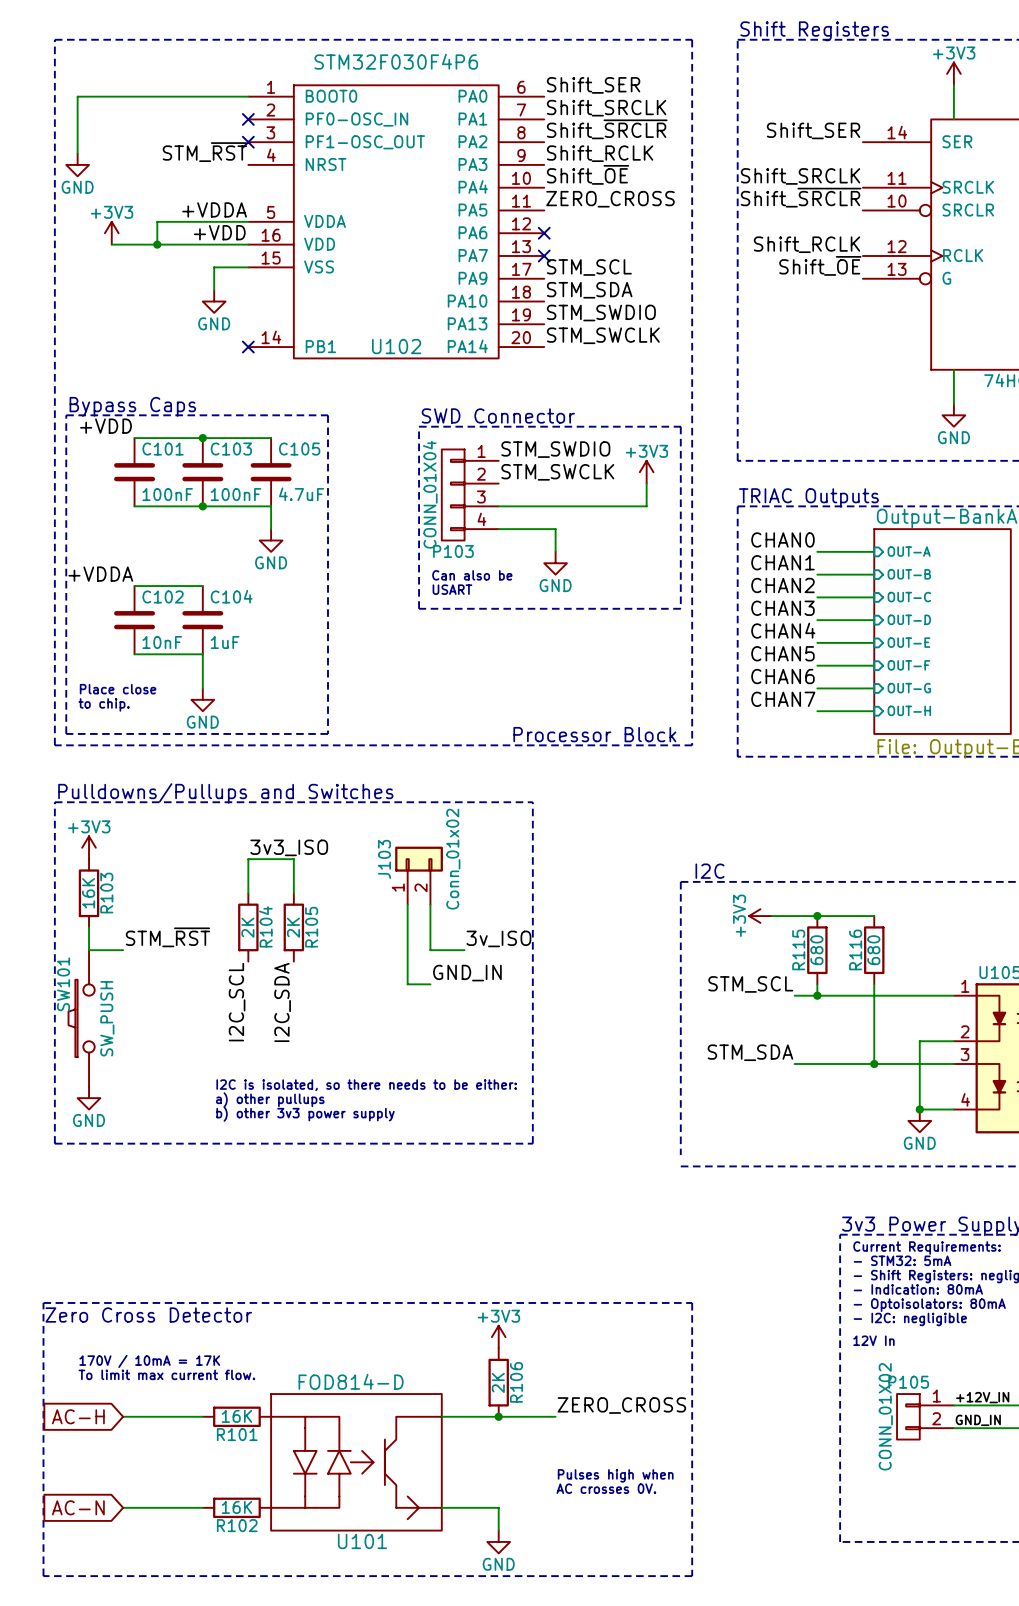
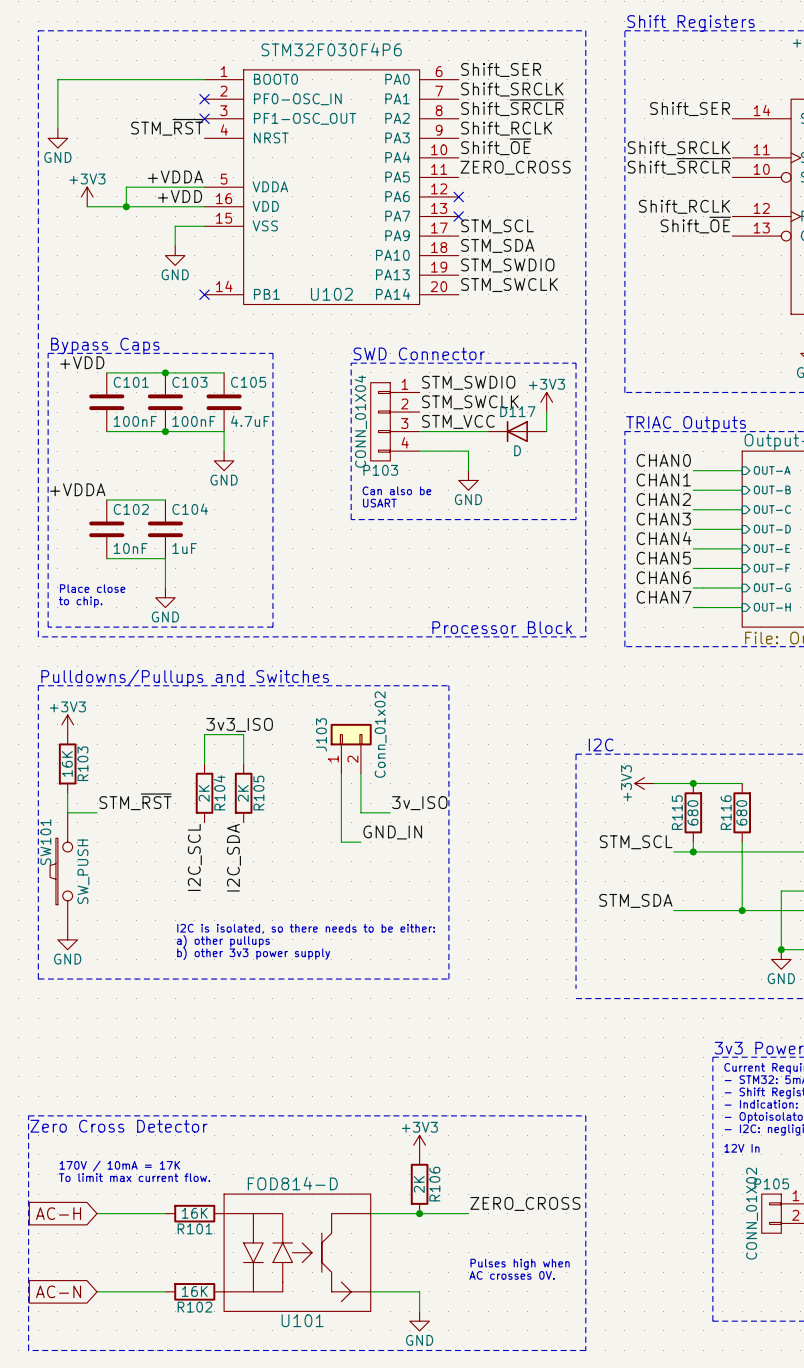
label: none -> STM_VCC (458, 421)
D117: none -> D (517, 431)

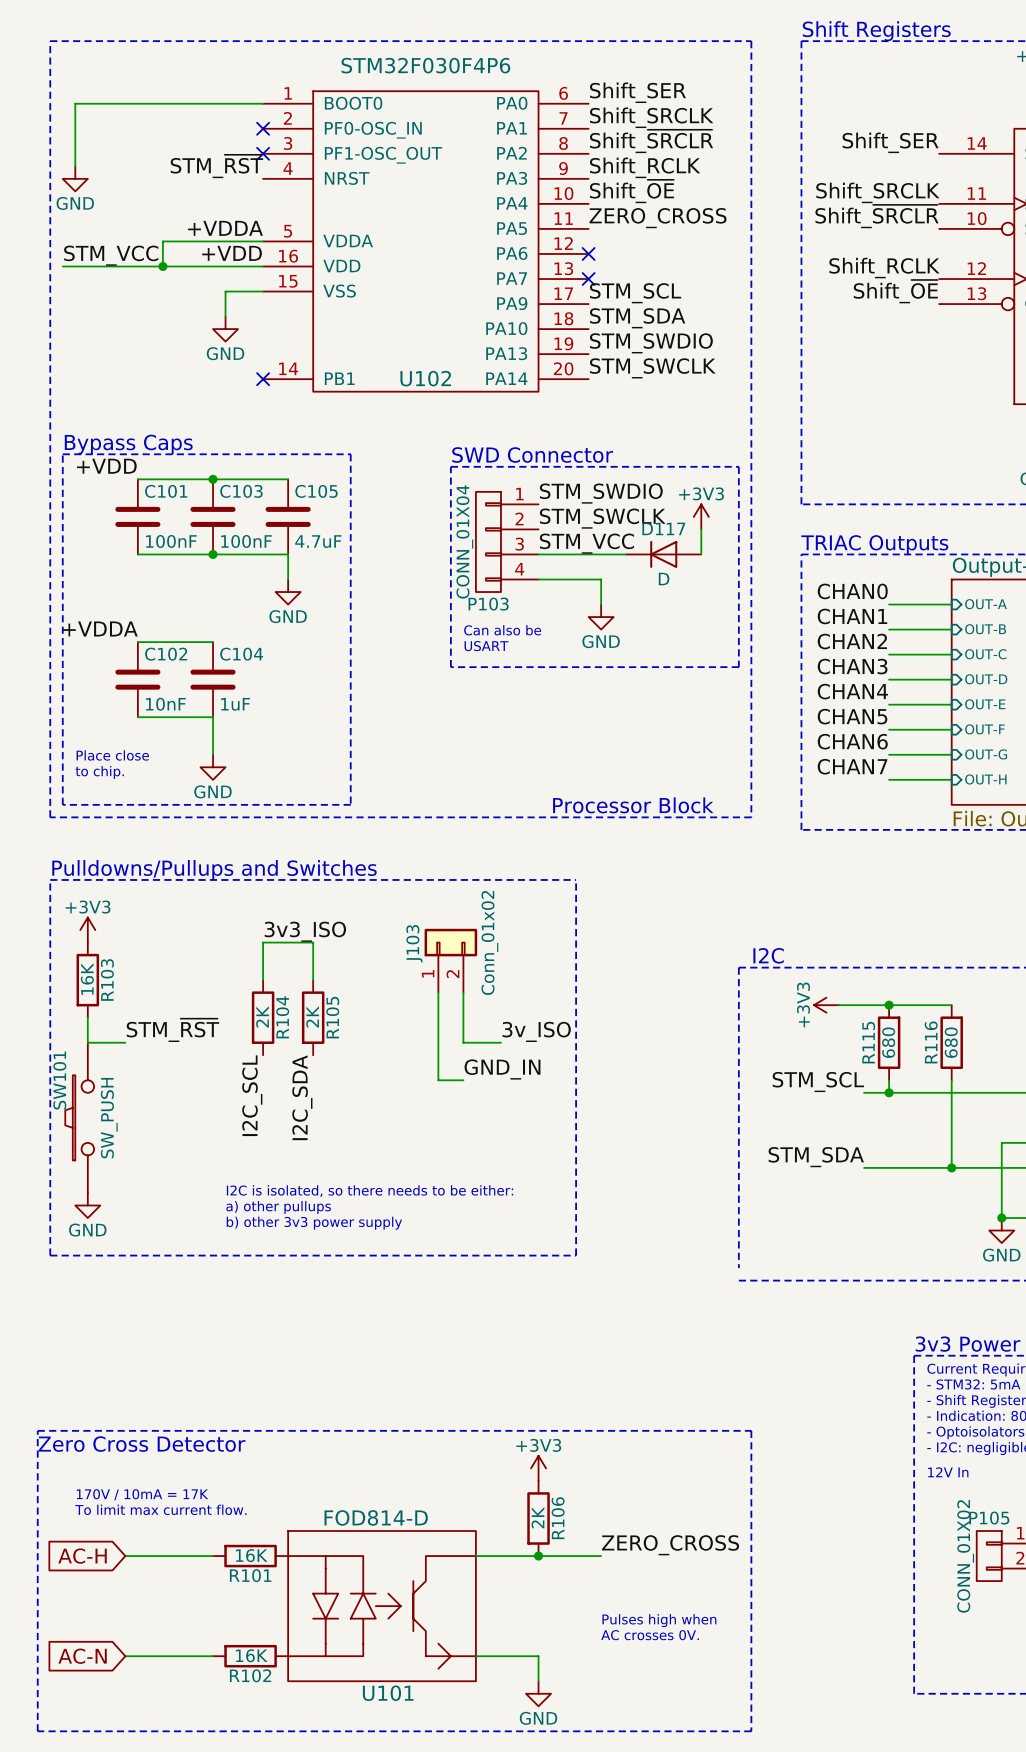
power symbol: +3V3 (87, 196) -> none
label: none -> STM_VCC (111, 255)
wire: none -> (62, 266) (112, 266)

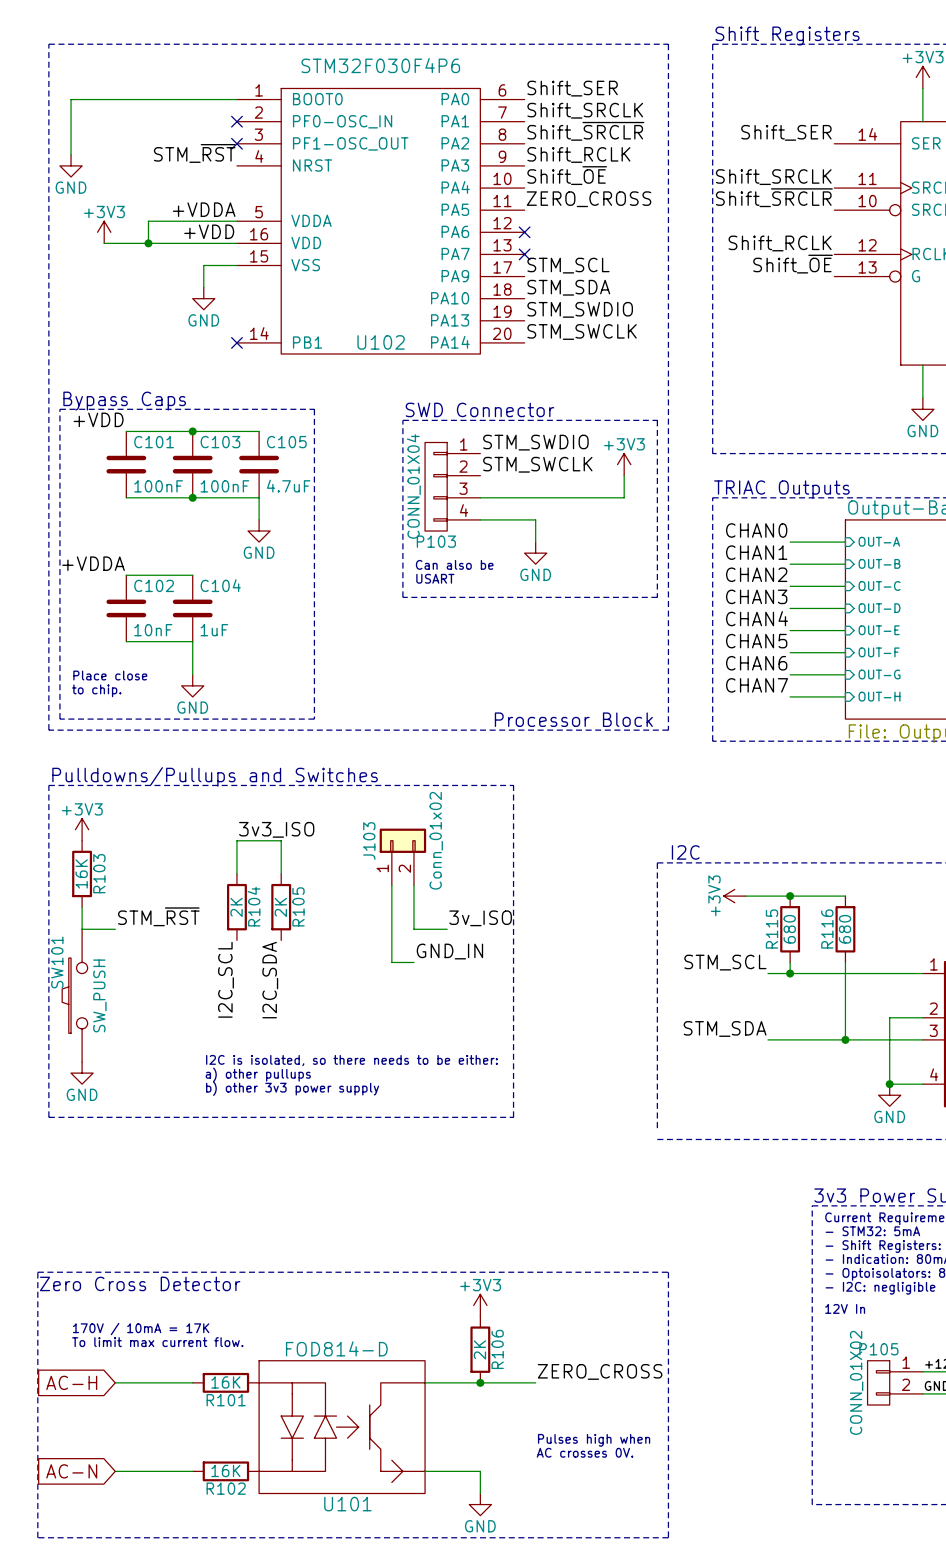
power symbol: none -> +3V3 (104, 232)
label: STM_VCC (111, 255) -> none
wire: (62, 266) (112, 266) -> none
label: STM_VCC (586, 543) -> none
D117: D (663, 554) -> none

